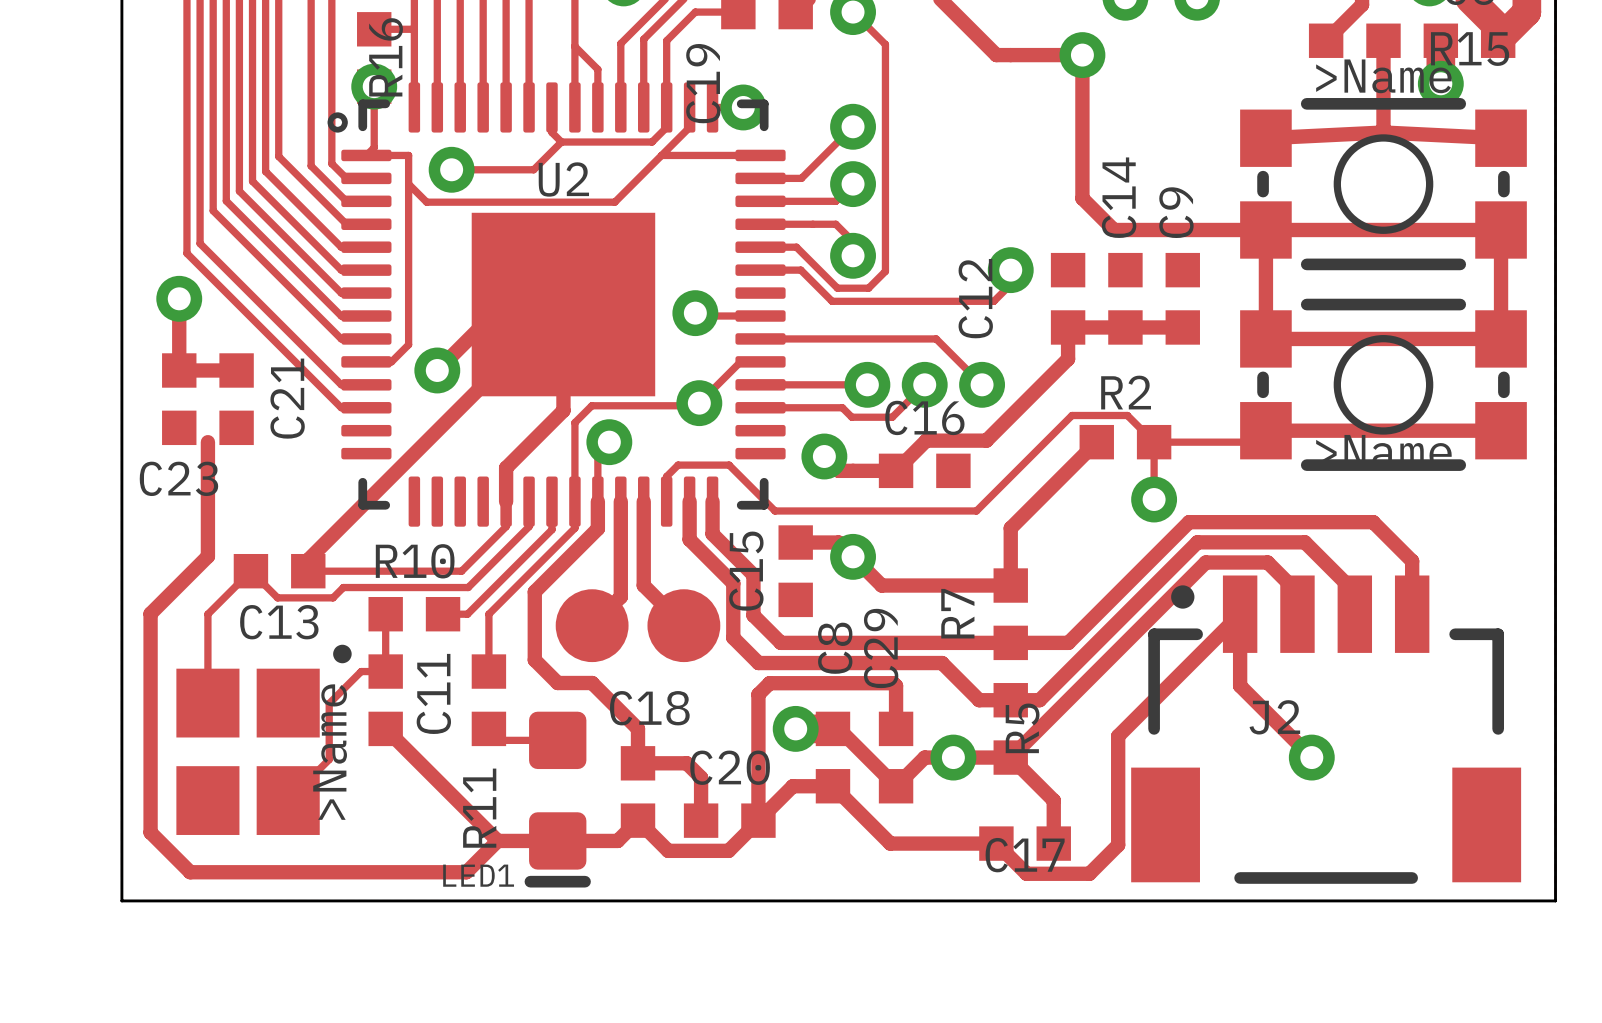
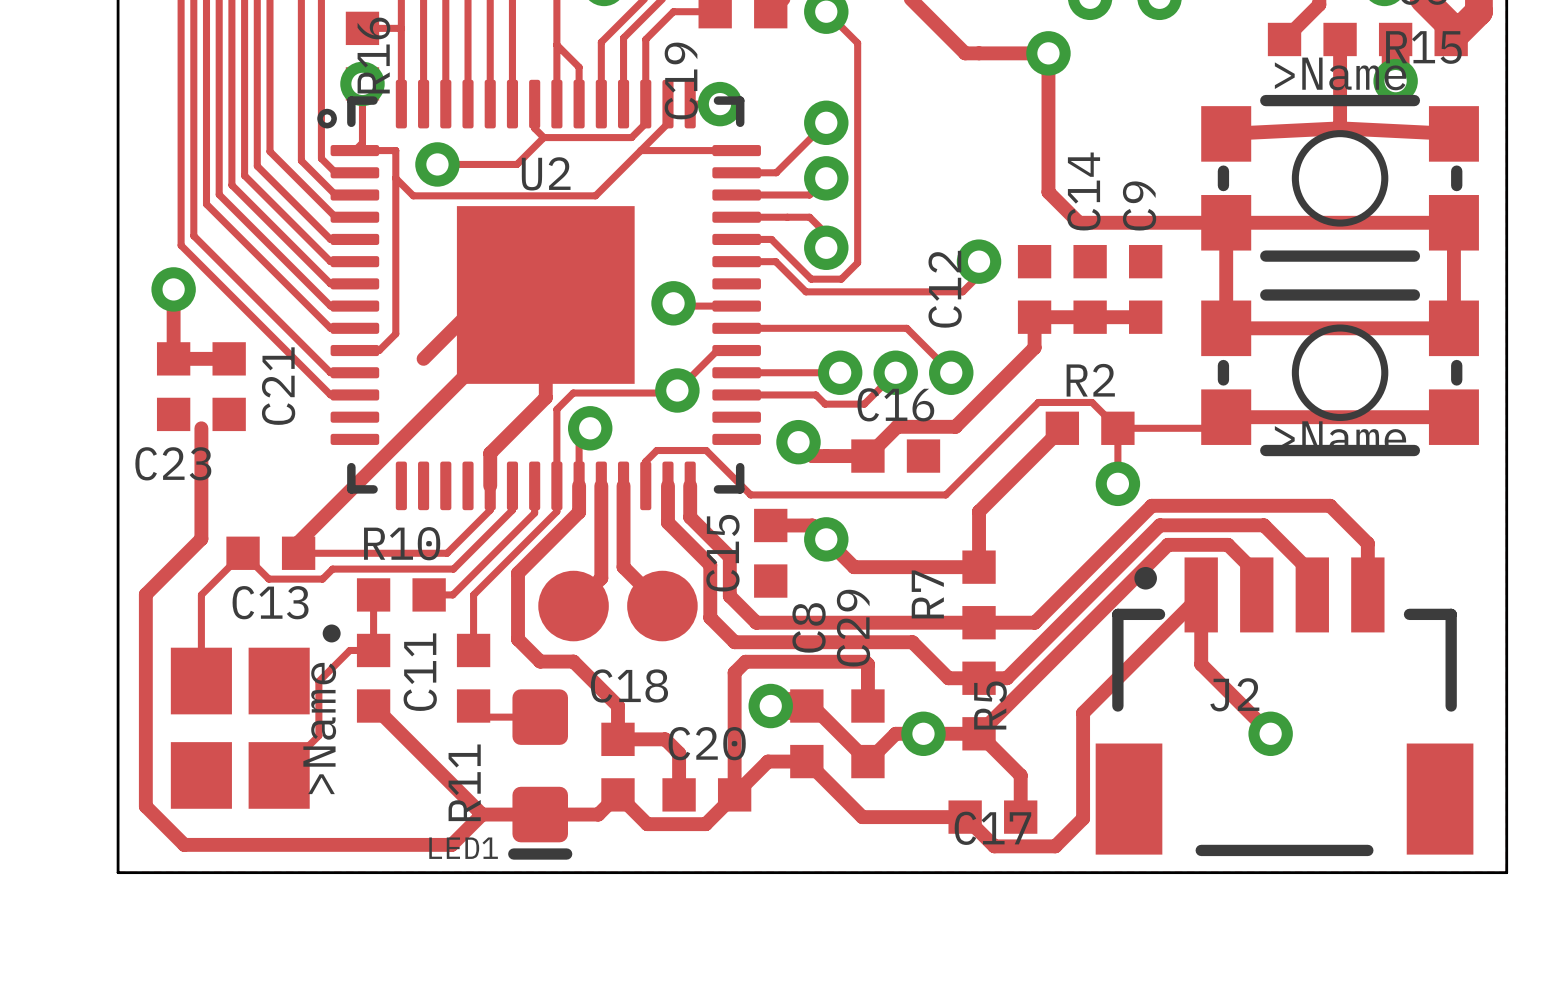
via: (437, 370) -> none

